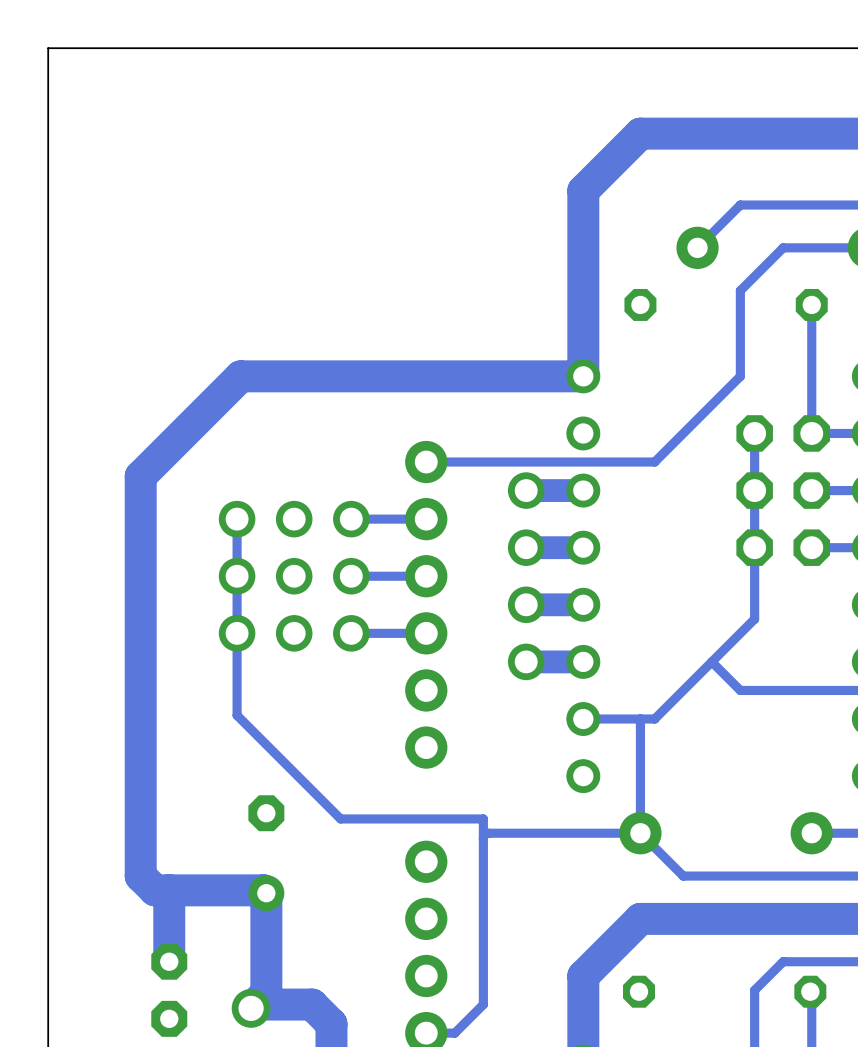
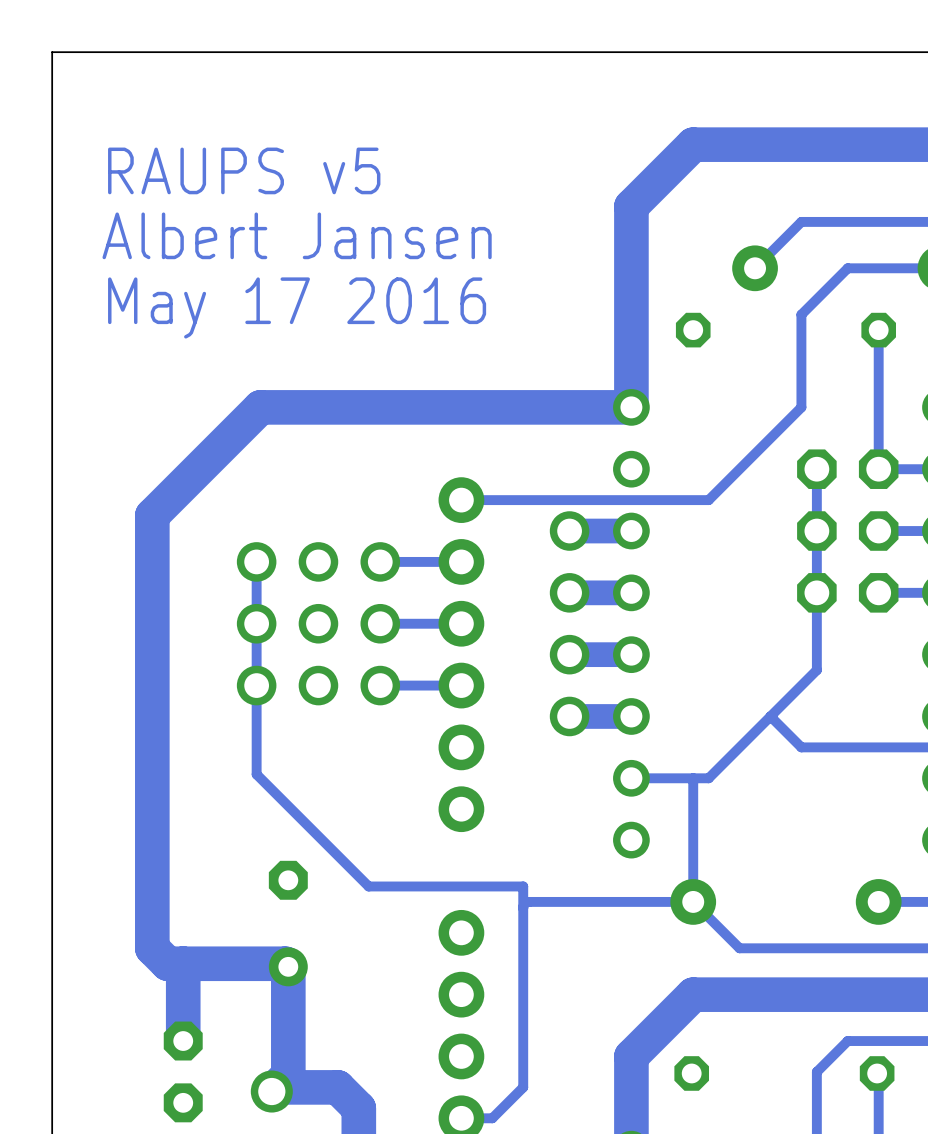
text: none -> RAUPS v5 (244, 170)
text: none -> Albert Jansen (297, 235)
text: none -> May 17 2016 (297, 307)

